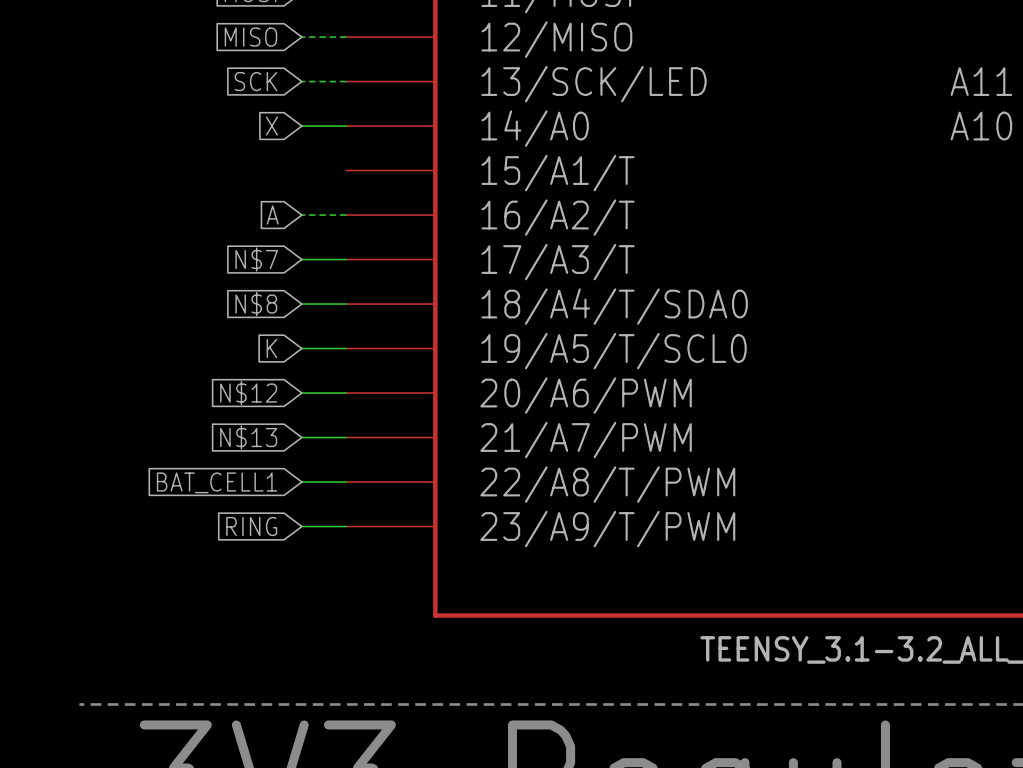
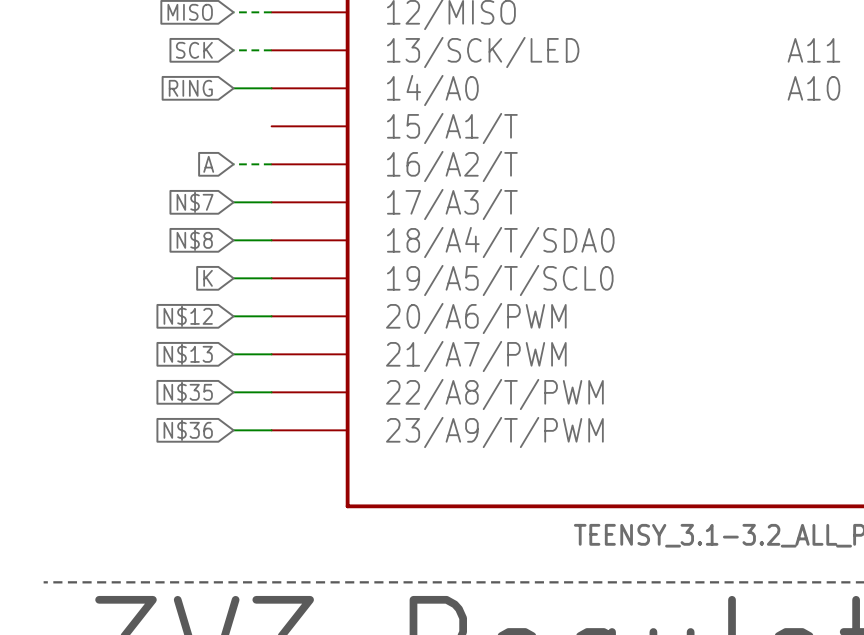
global label: X (271, 126) -> RING (190, 88)
global label: BAT_CELL1 (217, 482) -> N$35 (188, 392)
global label: RING (251, 526) -> N$36 (188, 430)

